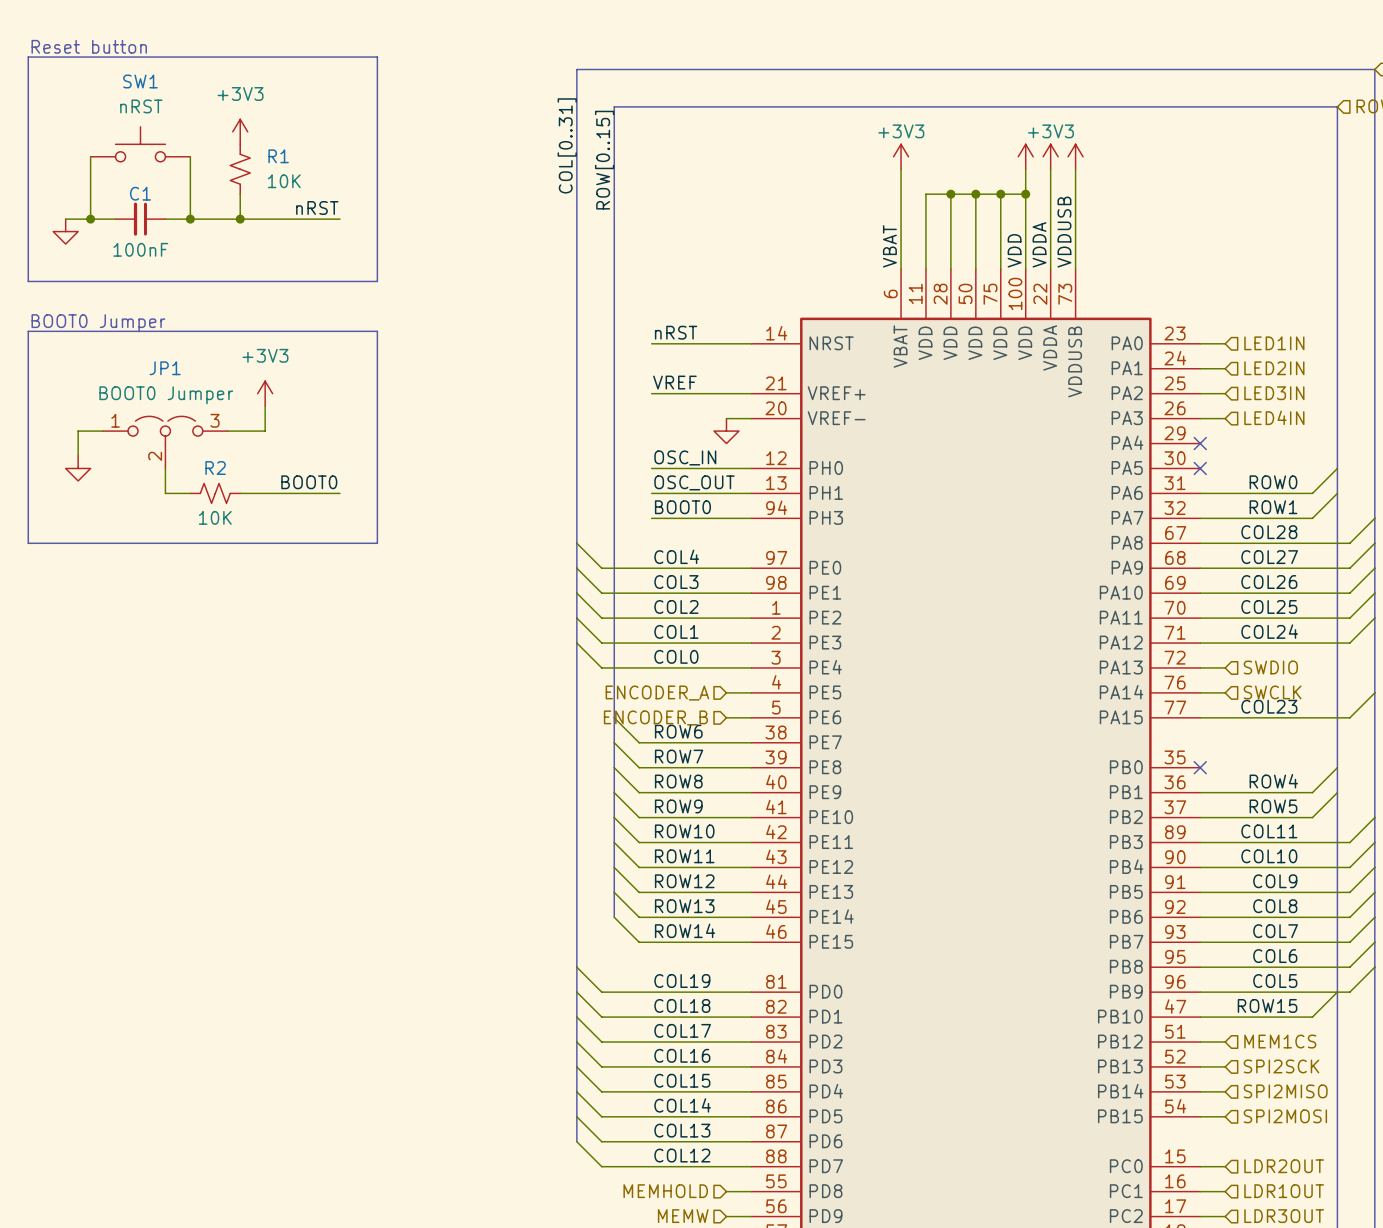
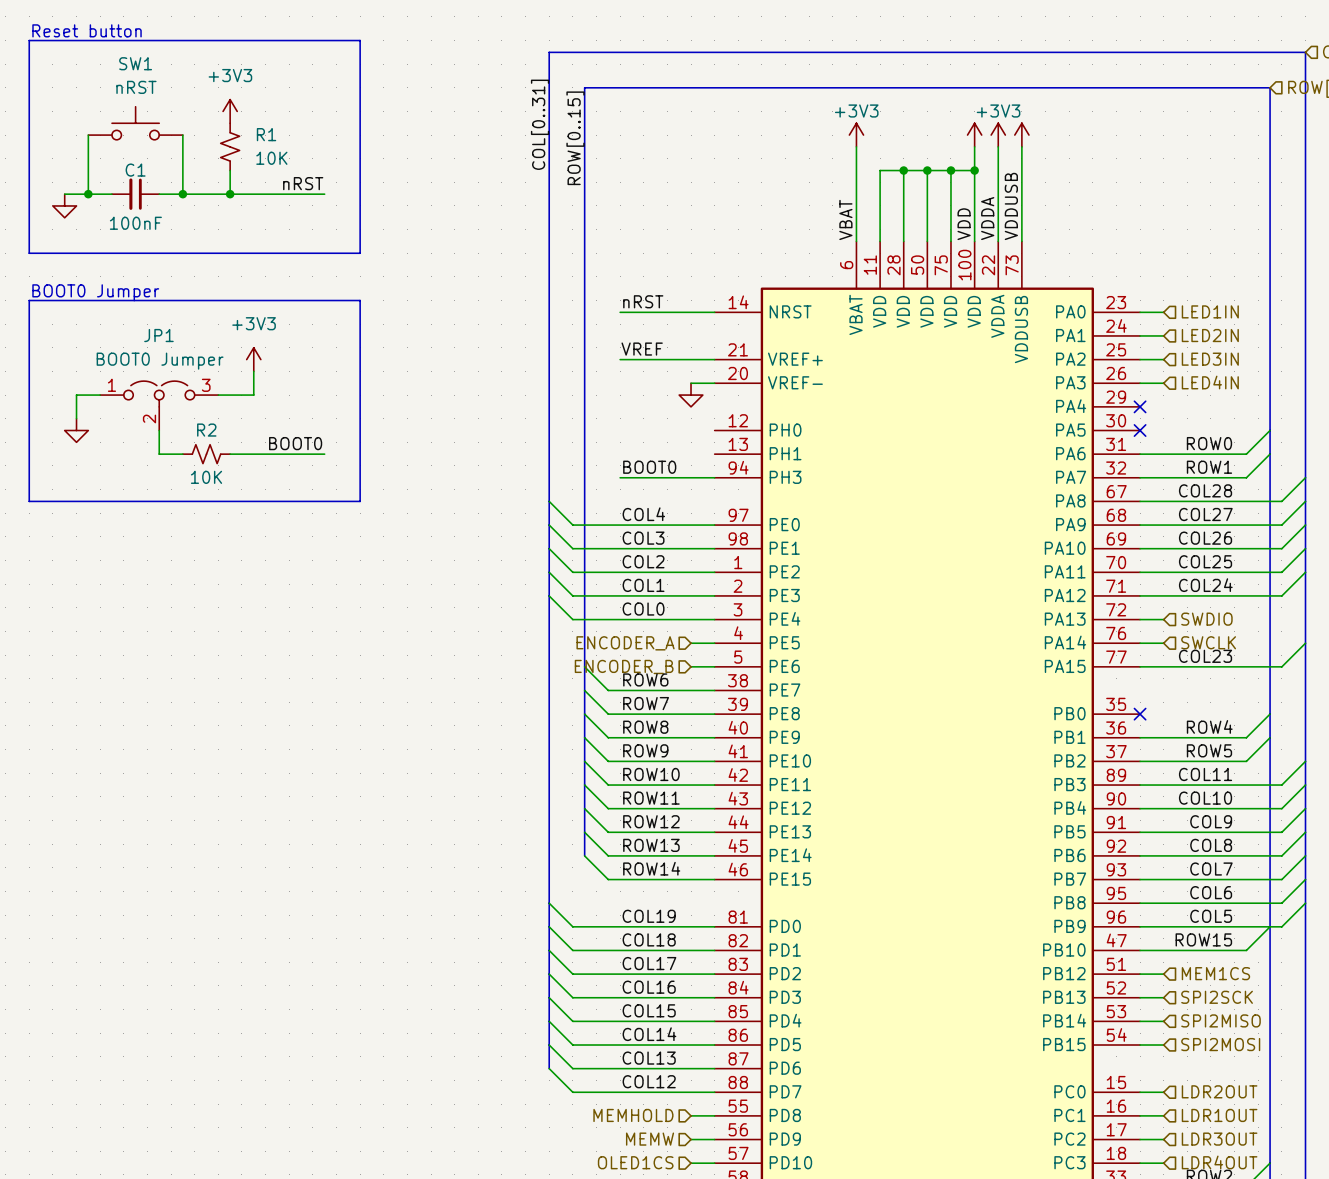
label: OSC_IN (685, 457) -> none
wire: (651, 468) (751, 468) -> none
label: OSC_OUT (694, 482) -> none
wire: (651, 493) (751, 493) -> none

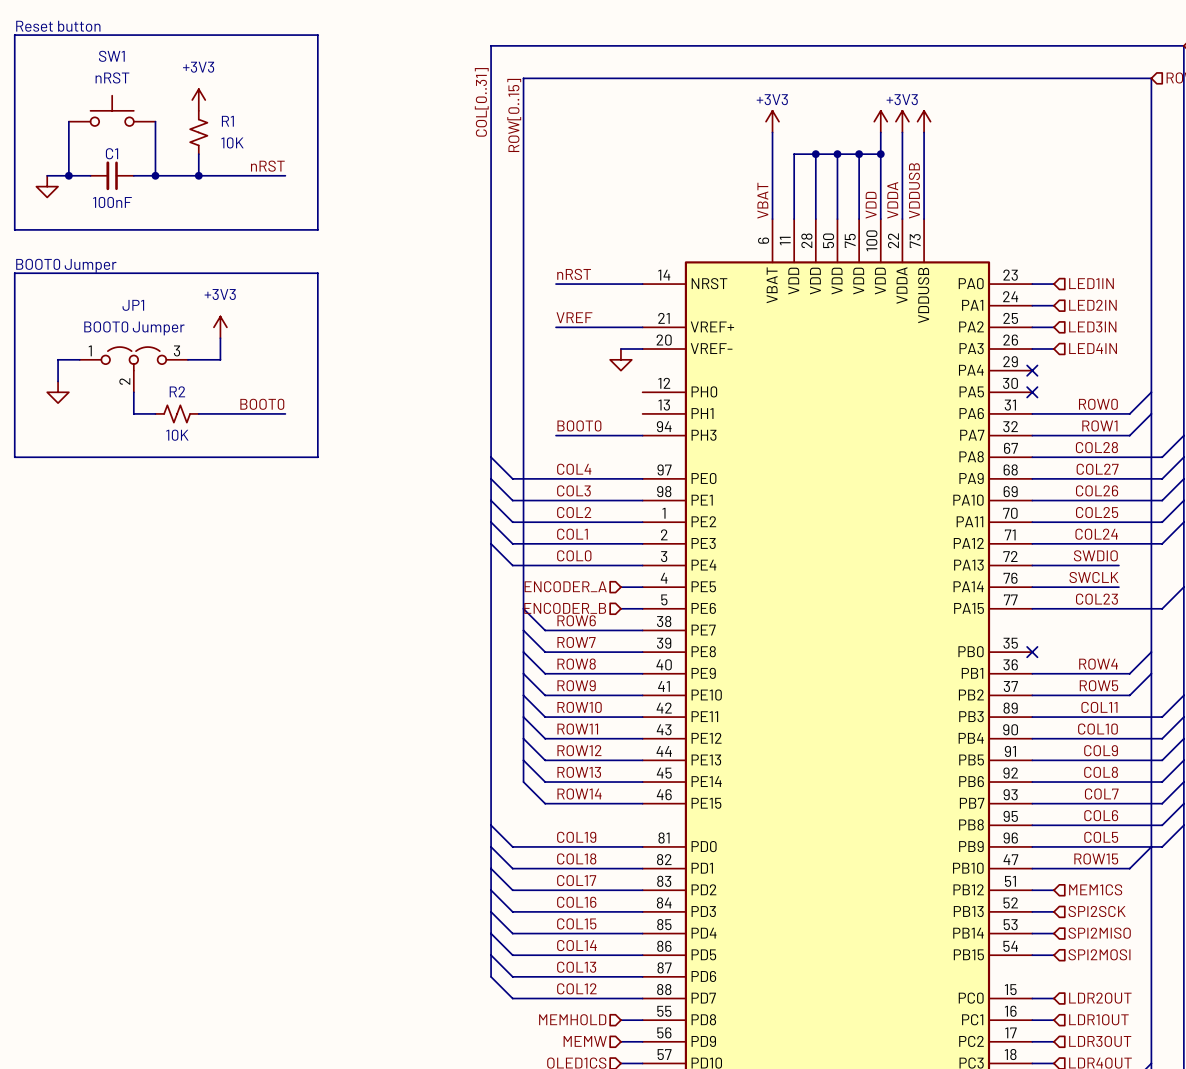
label: none -> SWDIO (1095, 555)
wire: none -> (1053, 565) (1118, 565)
hierarchical label: SWDIO (1206, 619) -> none
label: none -> SWCLK (1094, 577)
hierarchical label: SWCLK (1208, 642) -> none
wire: none -> (1053, 587) (1118, 587)

